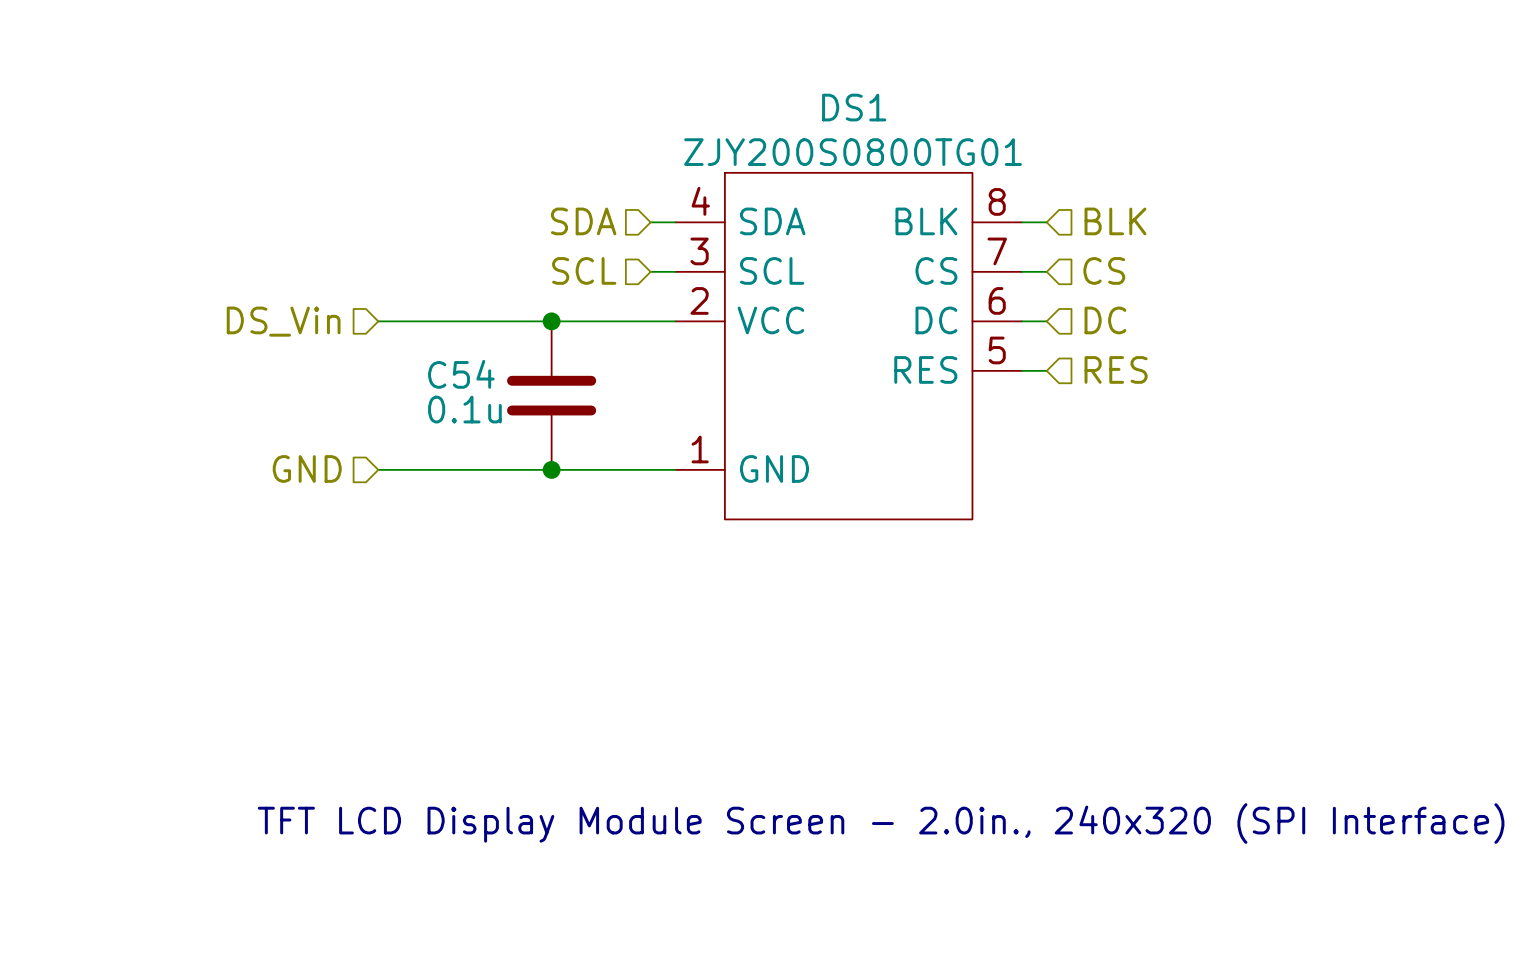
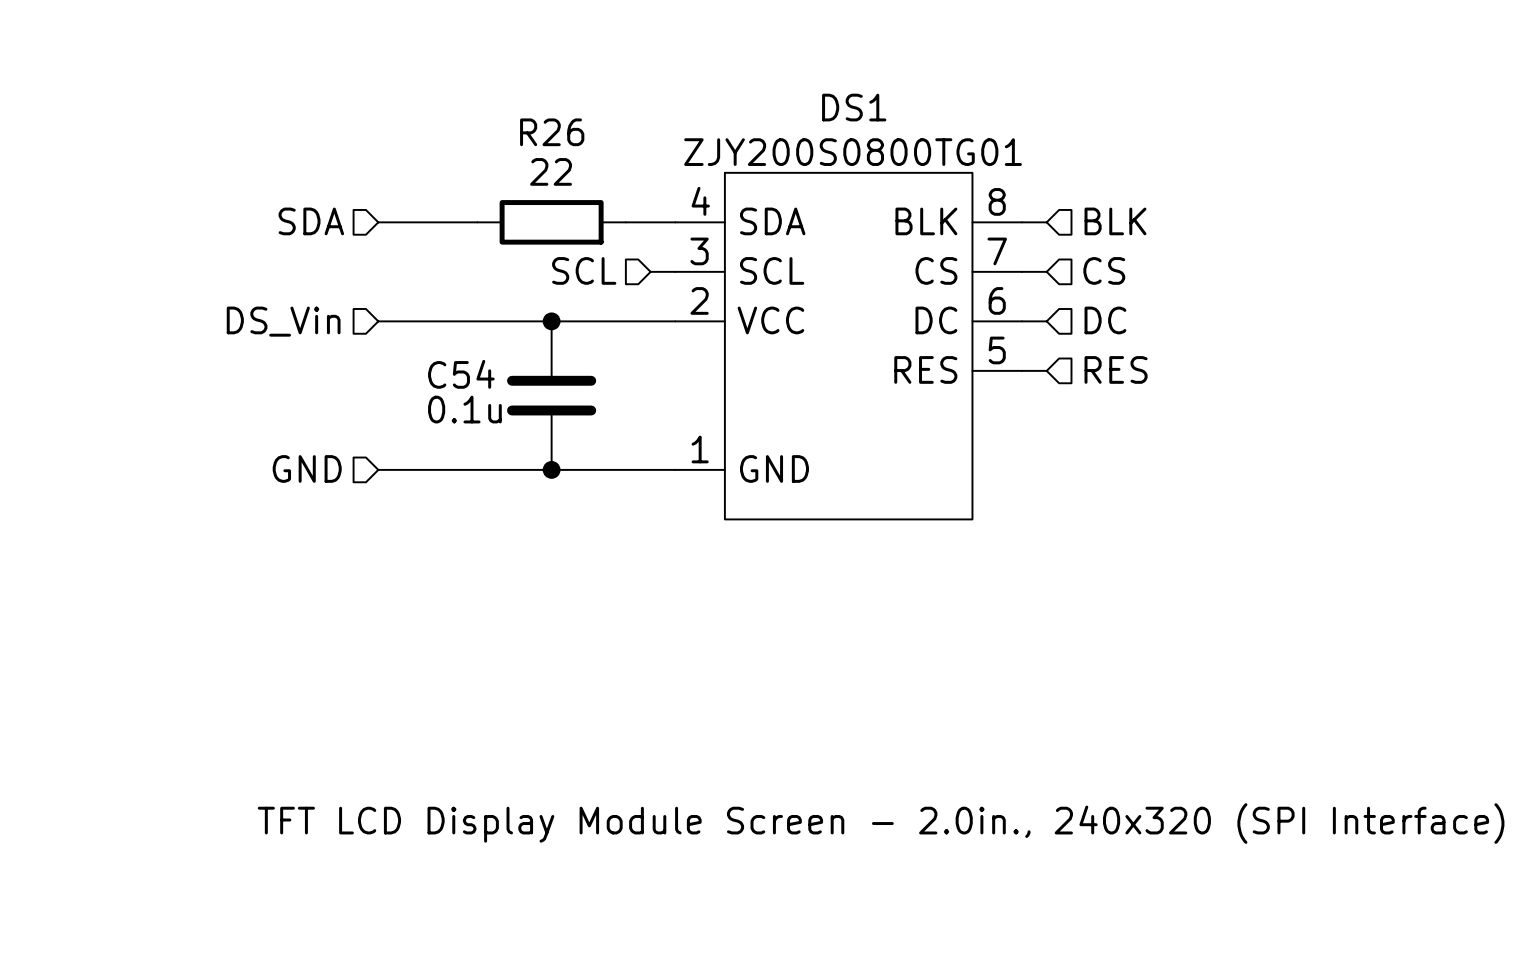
hierarchical label position: SDA (583, 221) -> SDA (311, 221)
wire: none -> (378, 222) (477, 222)
R26: none -> 22 (551, 222)
wire: none -> (625, 222) (650, 222)

